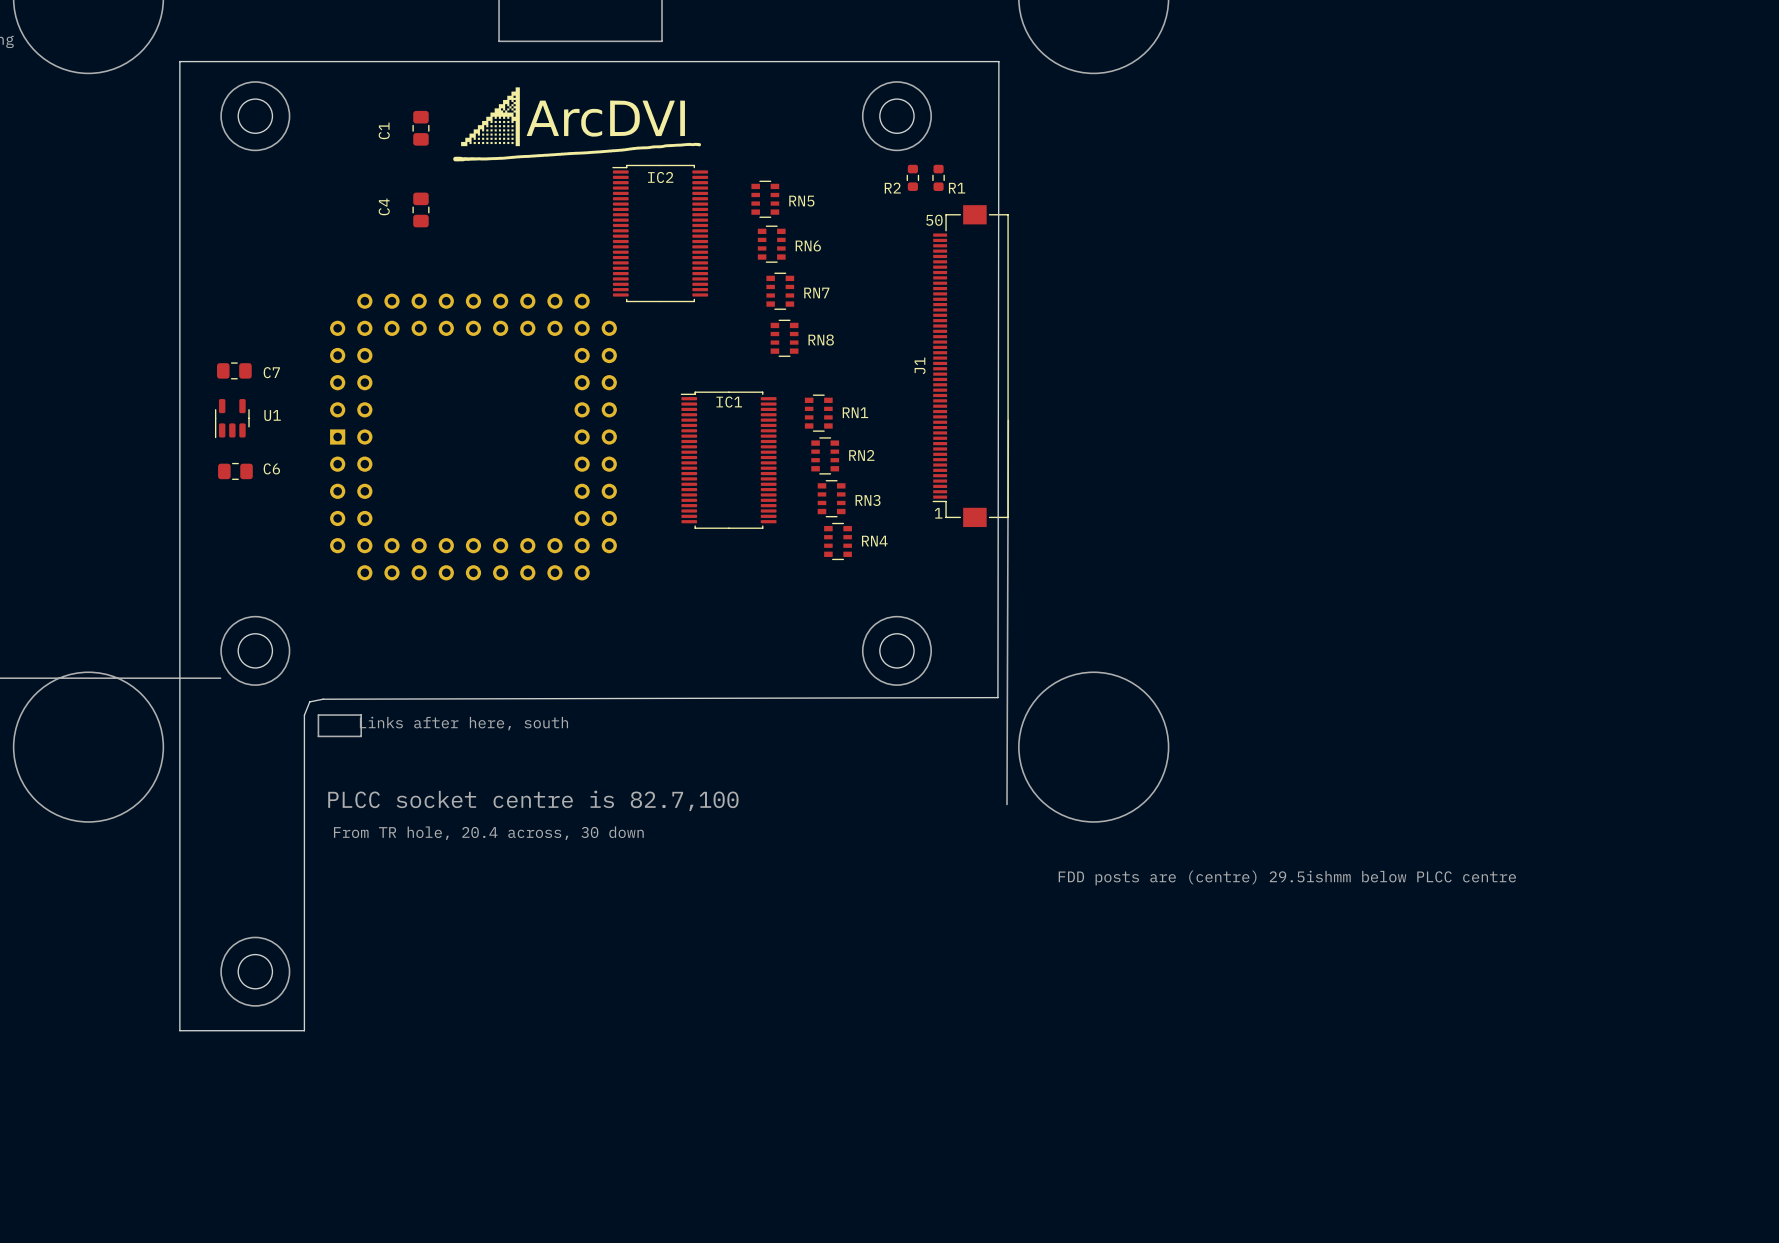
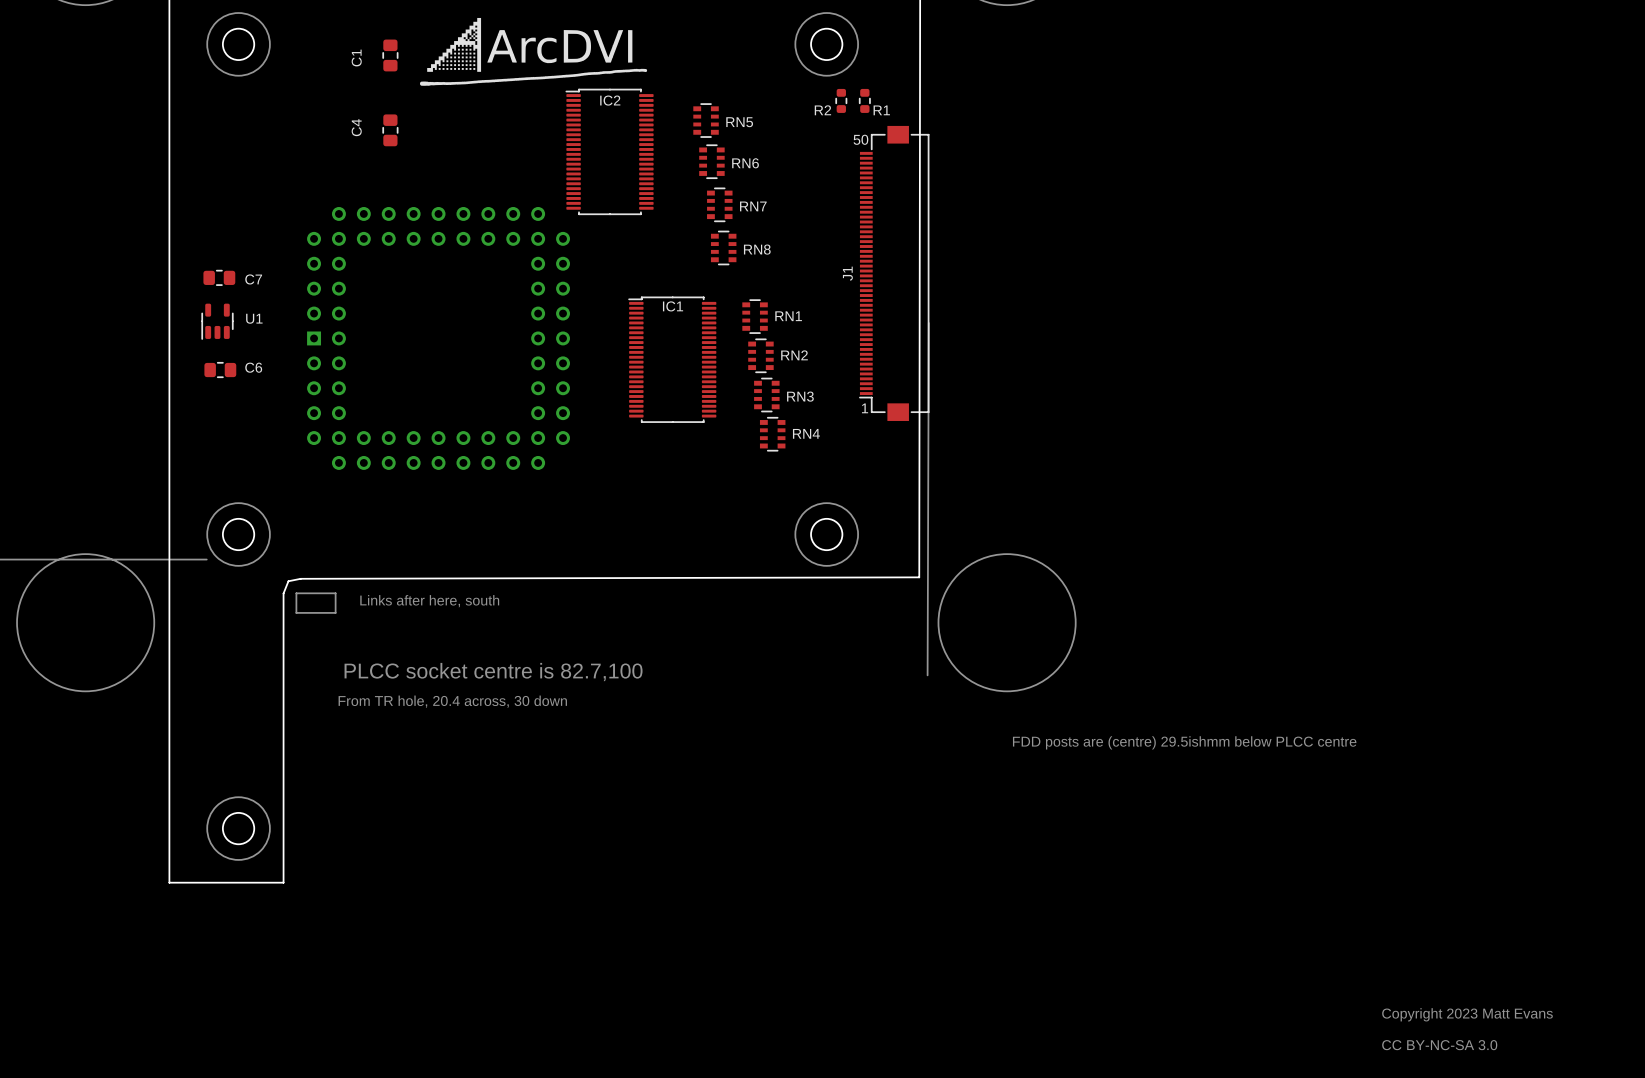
text: none -> Copyright 2023 Matt Evans (1467, 1014)
text: none -> CC BY-NC-SA 3.0 (1439, 1045)

